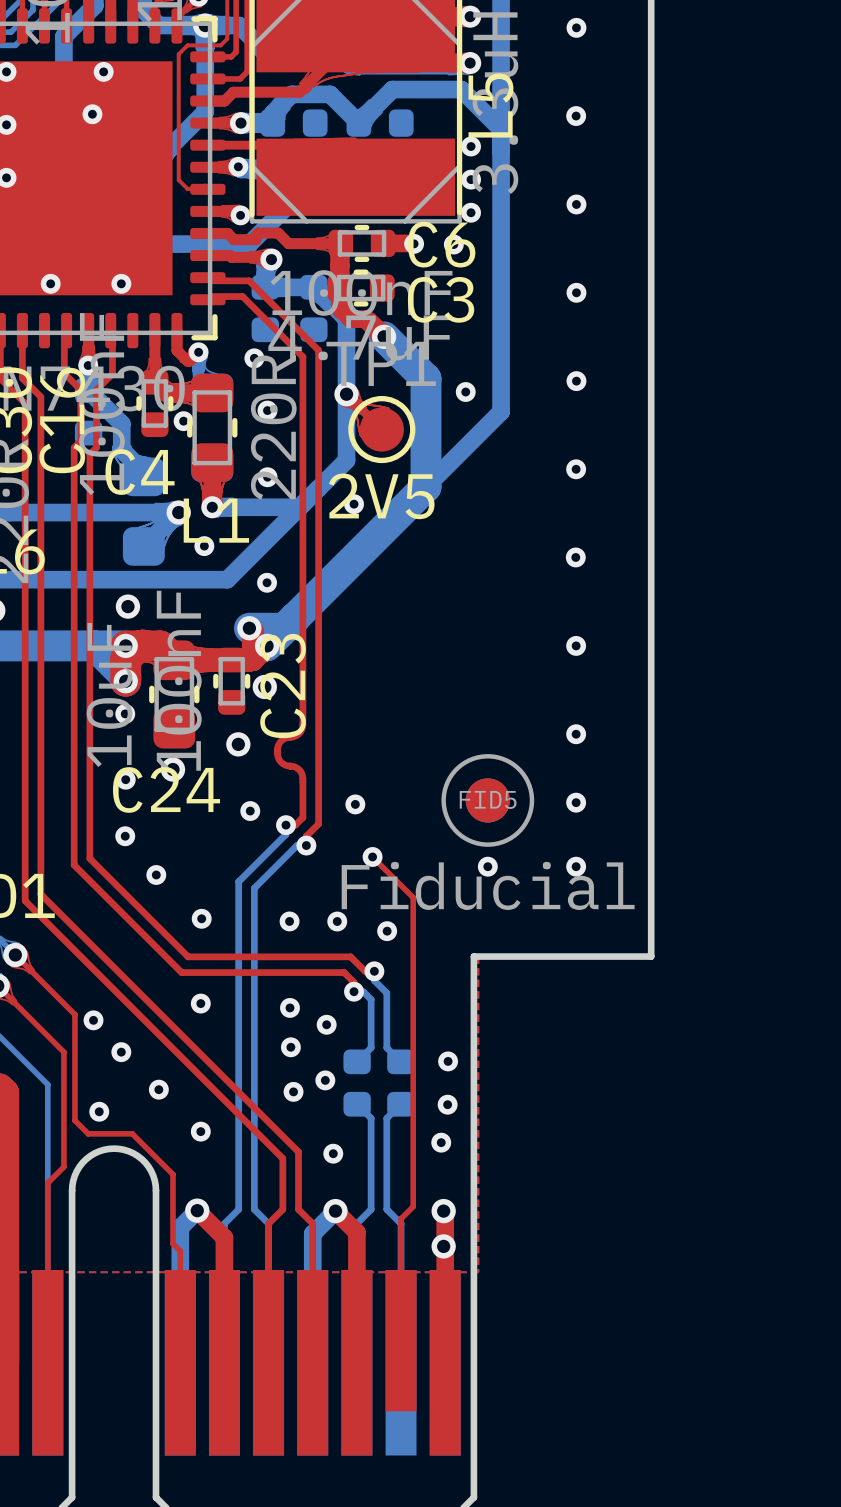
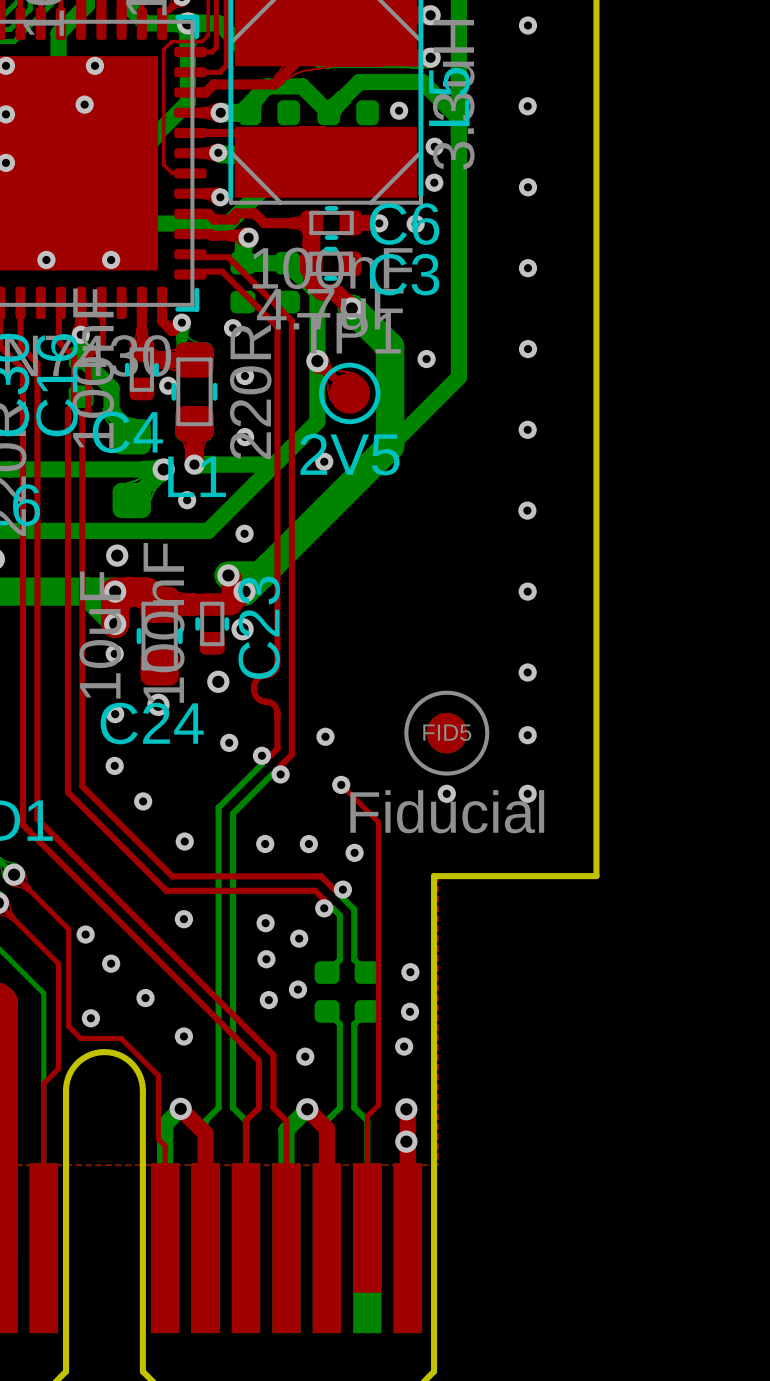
via: none -> (399, 110)
via: (471, 146) -> none
via: none -> (434, 146)
via: (471, 179) -> none
via: none -> (434, 182)
via: (471, 212) -> none

